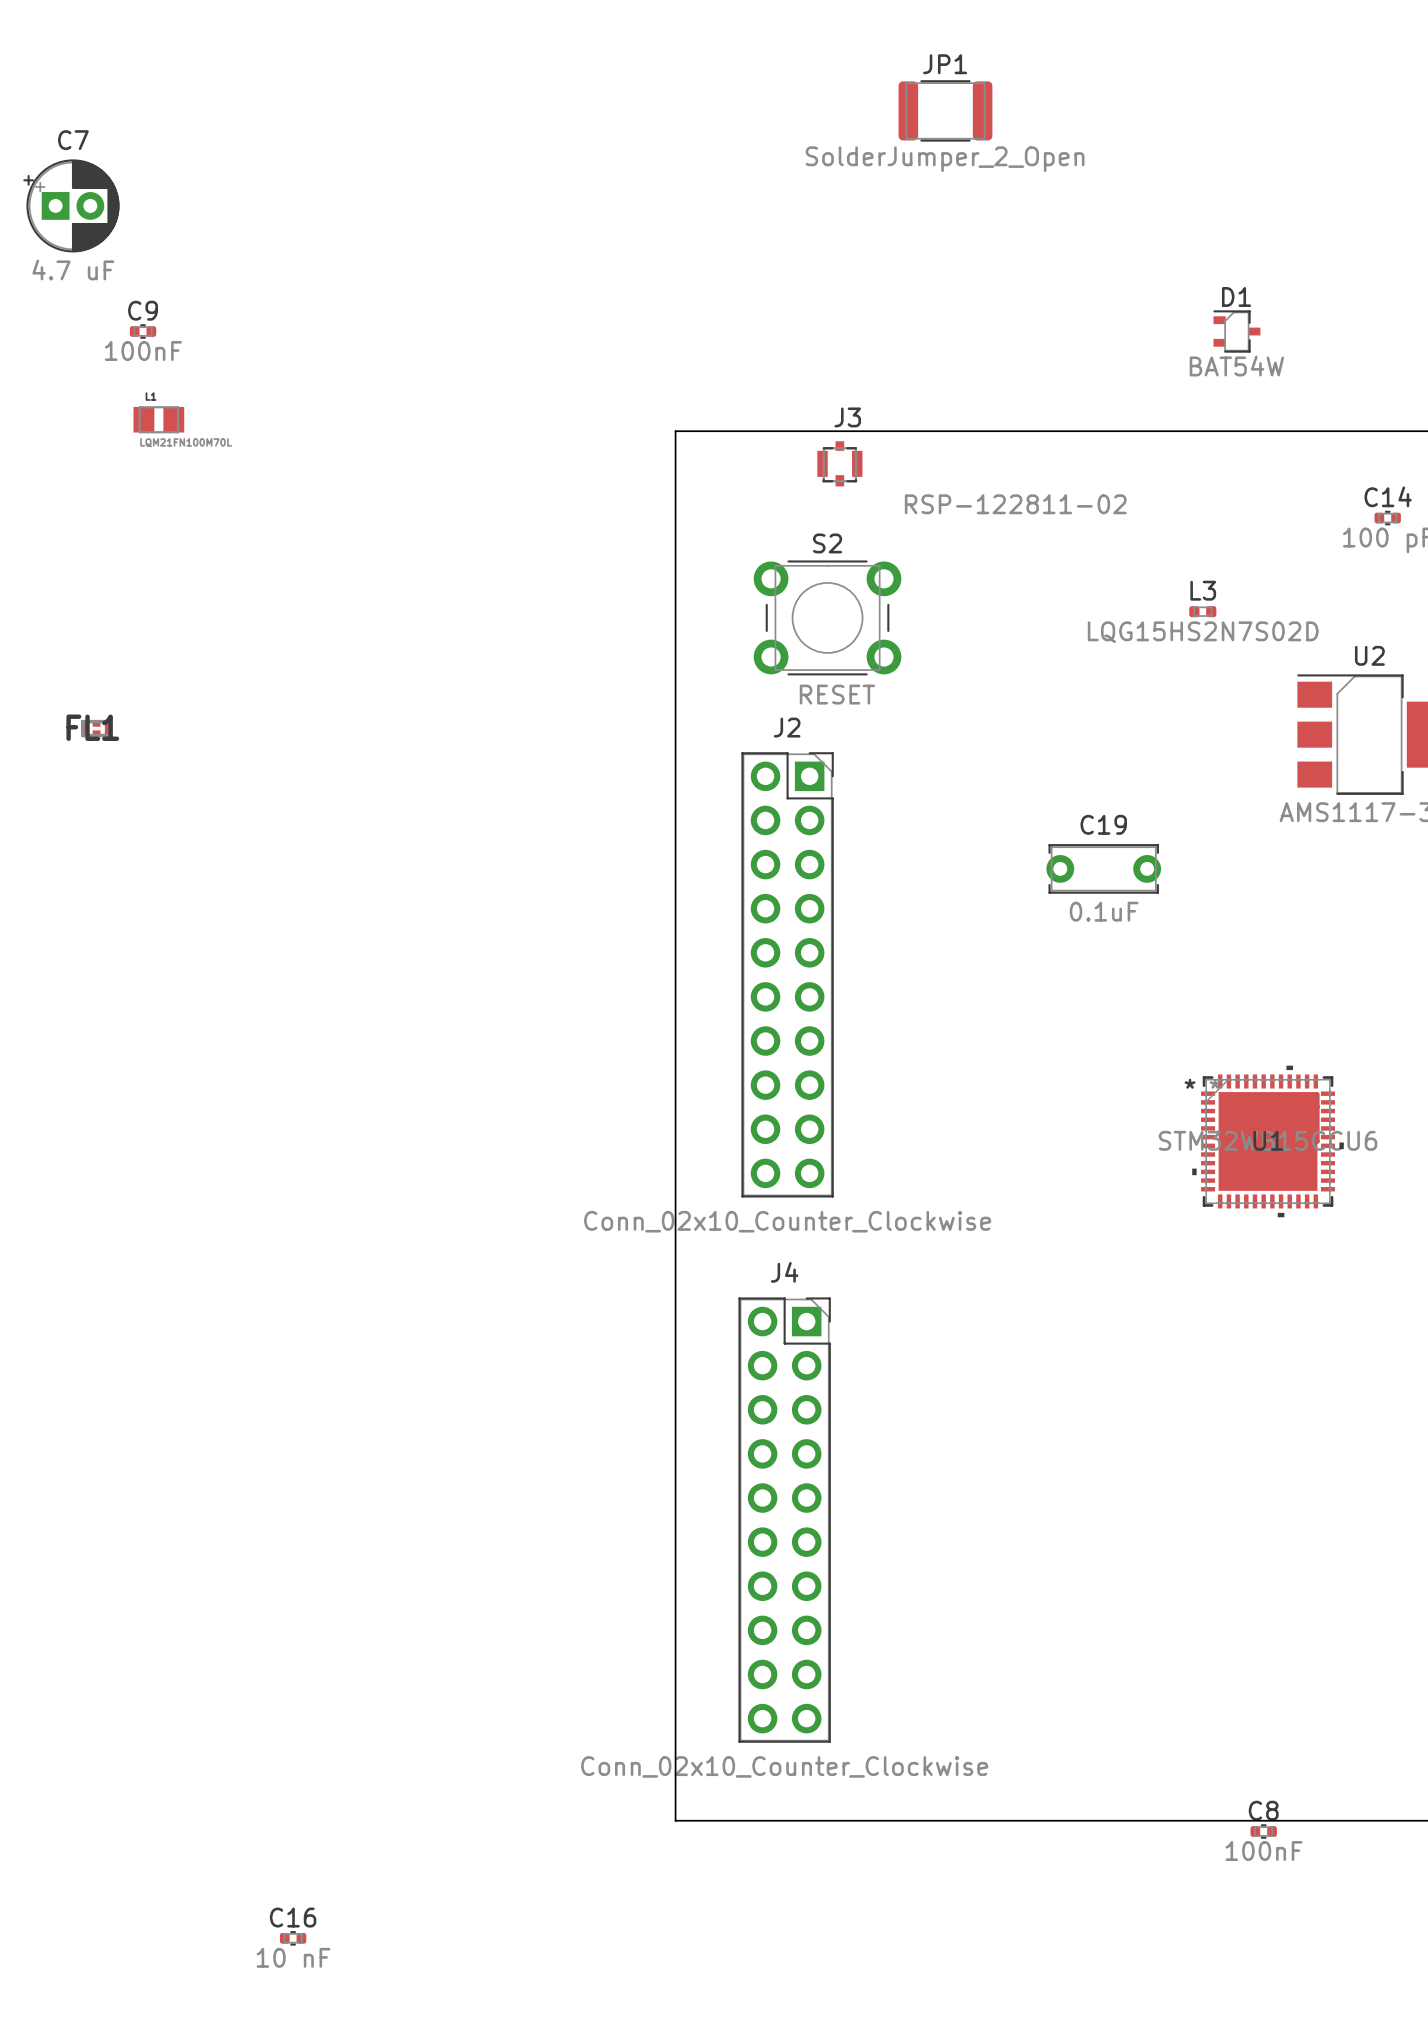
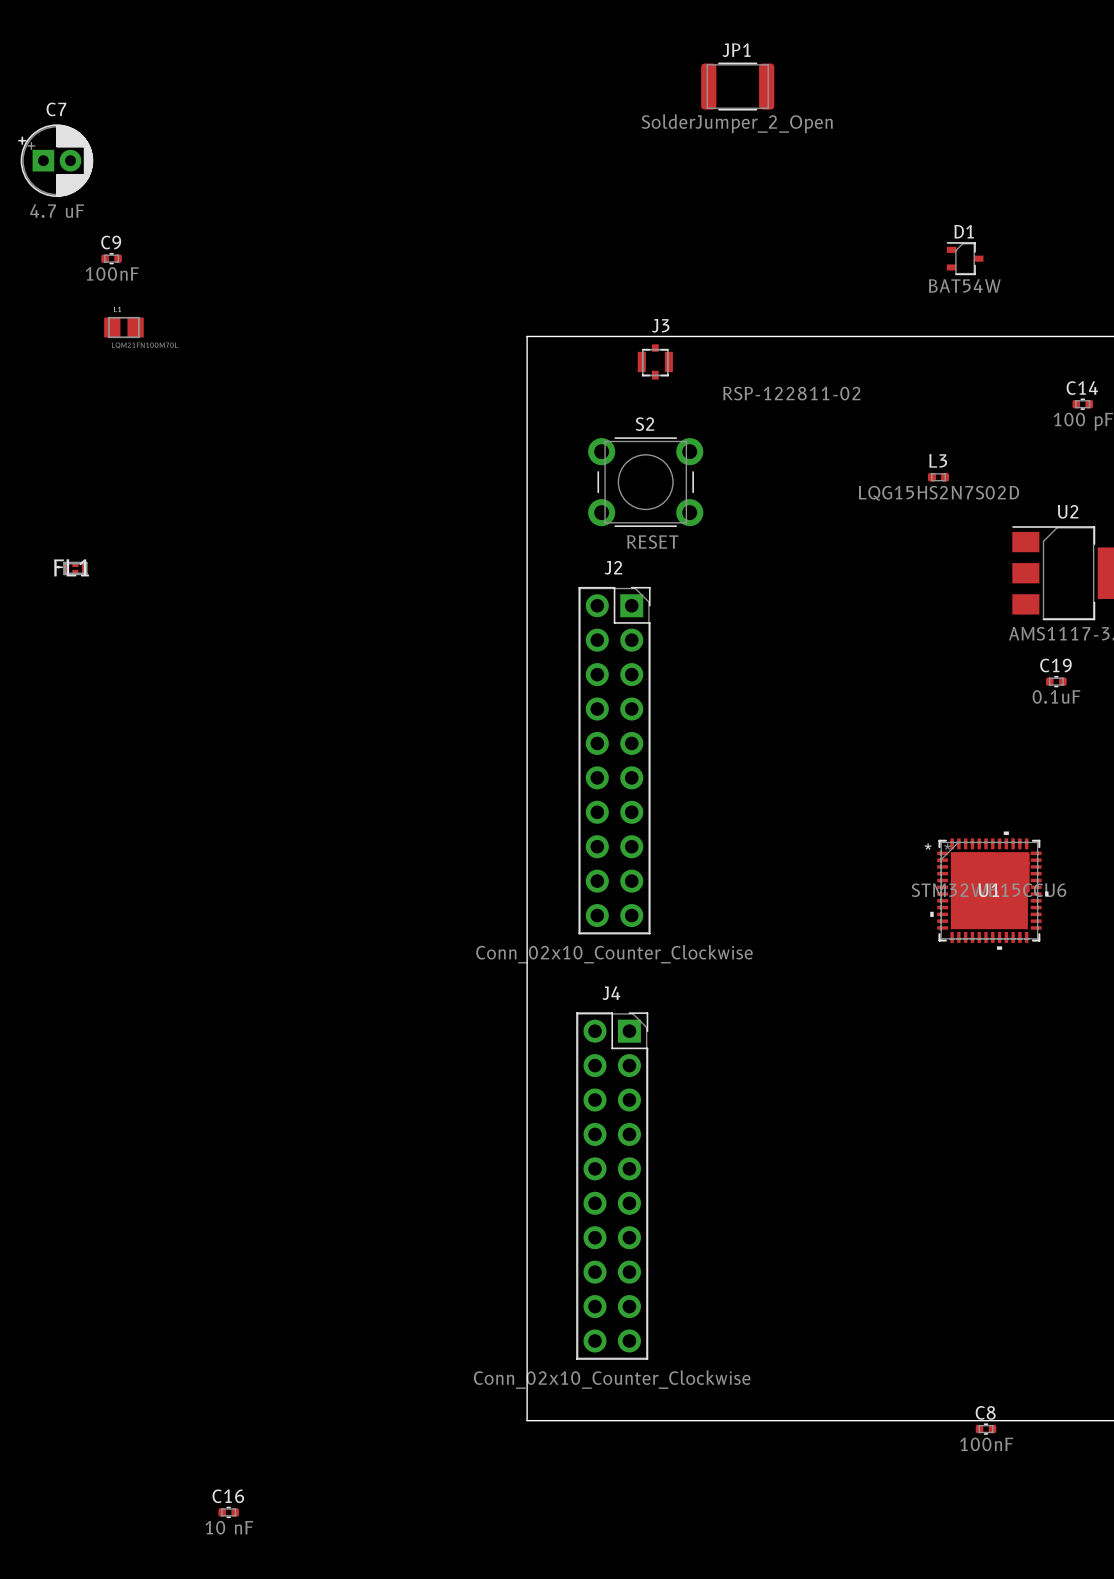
C19 footprint: [1046, 844, 1162, 894] -> [1046, 675, 1067, 688]

